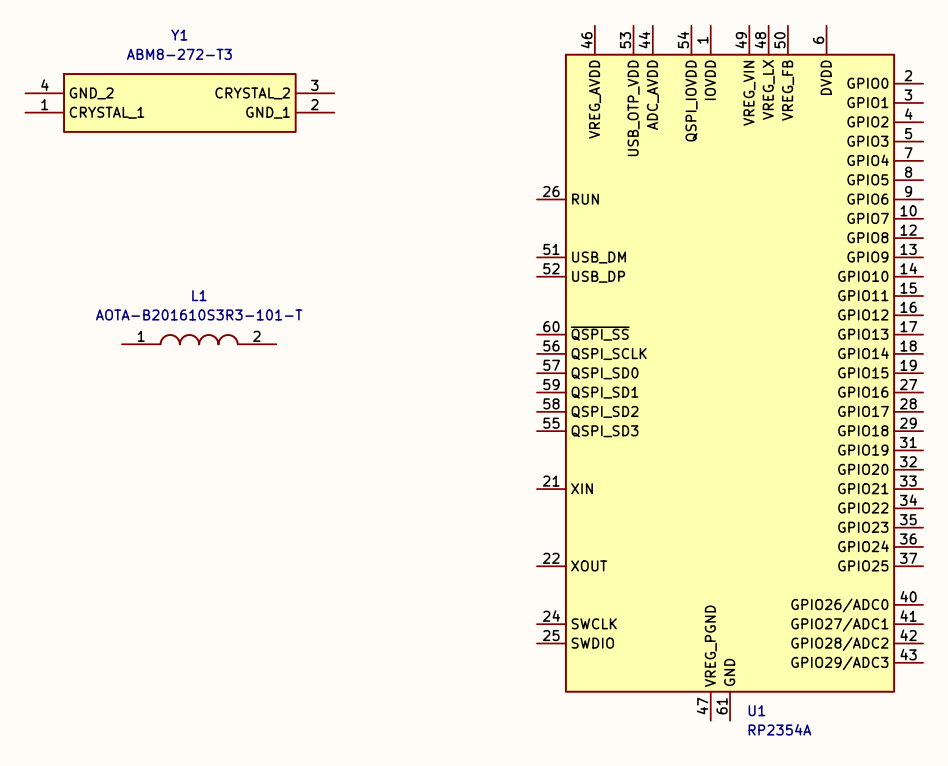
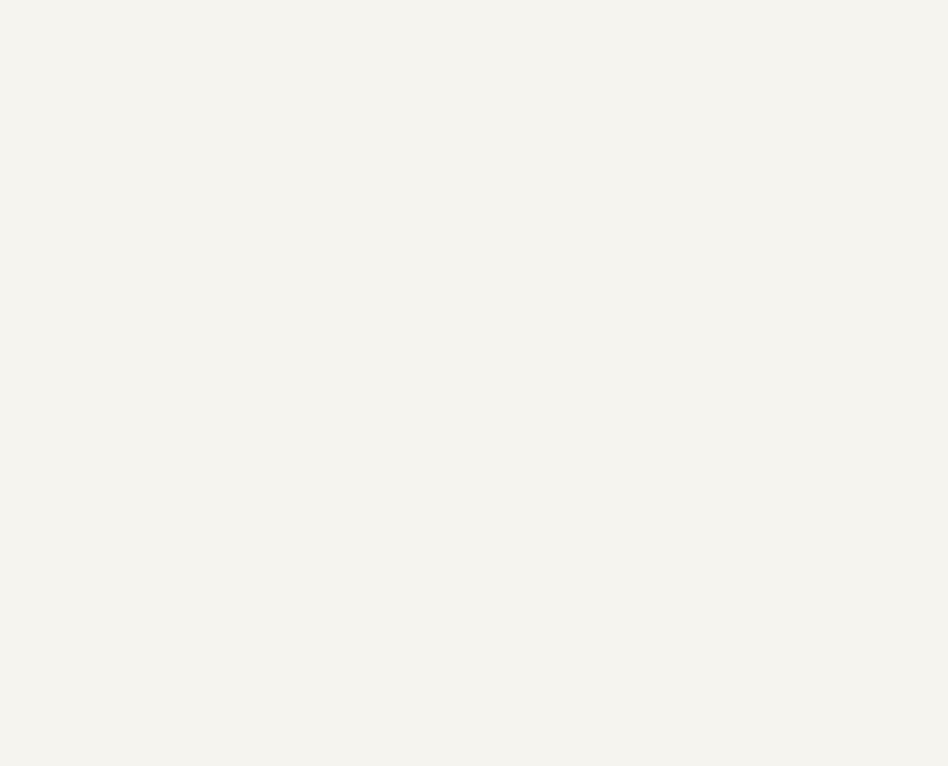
Y1: ABM8-272-T3 (179, 102) -> none
L1: AOTA-B201610S3R3-101-T (199, 339) -> none
U1: RP2354A (730, 373) -> none

